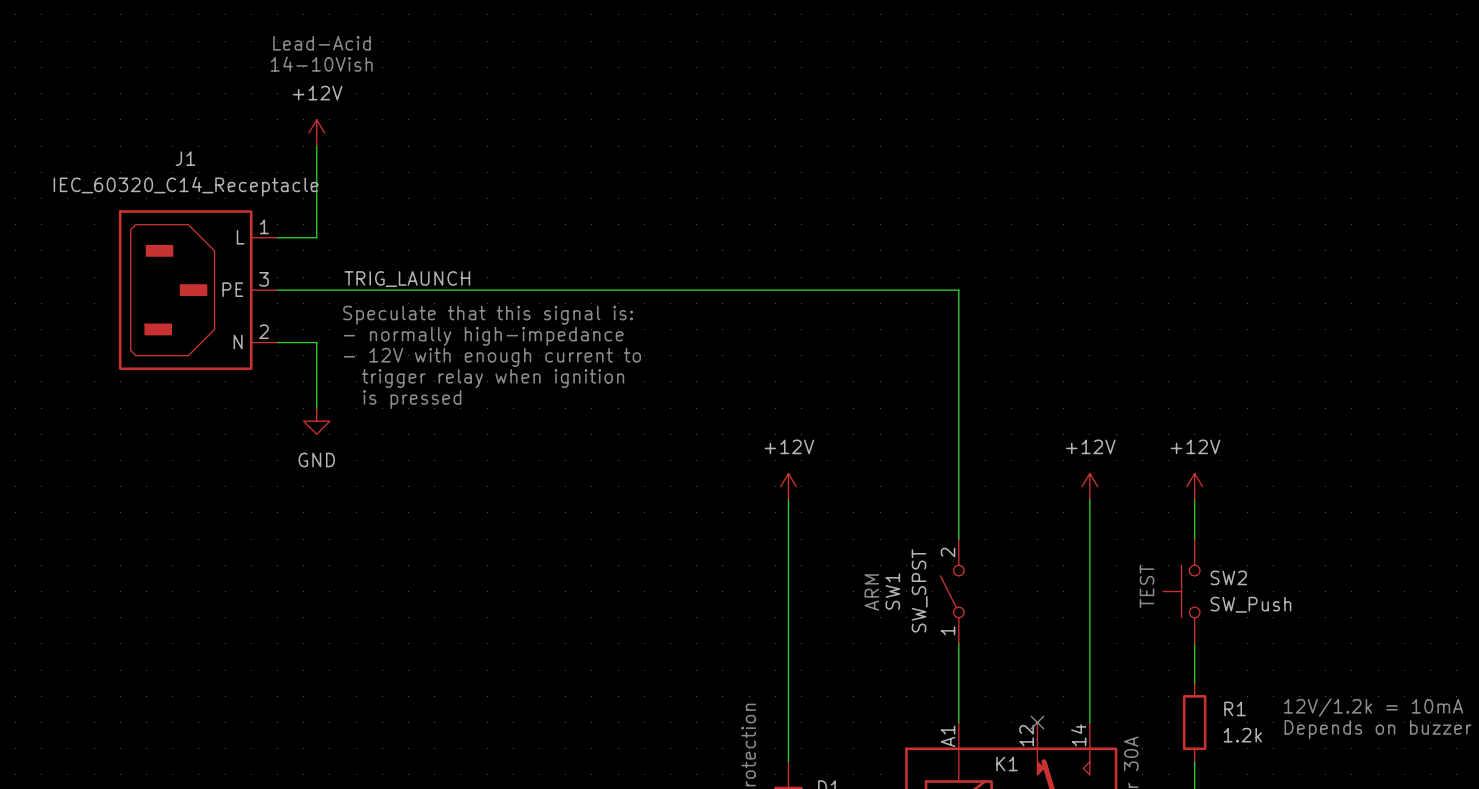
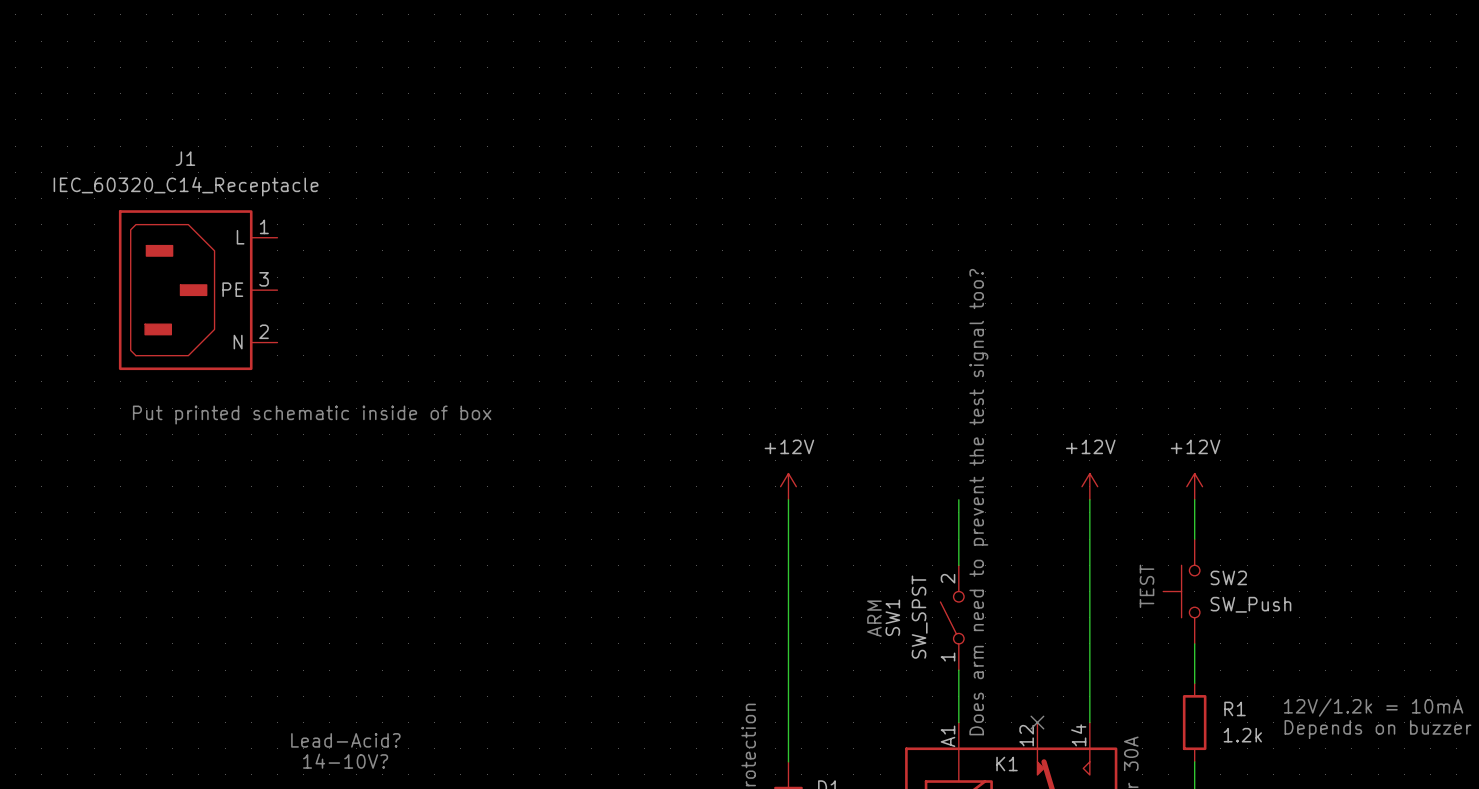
text: Lead-Acid (322, 43) -> none
text: 14-10Vish (321, 64) -> none
power symbol: +12V (316, 132) -> none
wire: (316, 146) (316, 237) (277, 237) -> none
label: TRIG_LAUNCH (407, 279) -> none
wire: (277, 290) (958, 290) (958, 499) -> none
text: Speculate that this signal is: (488, 315) -> none
text: - normally high-impedance (483, 336) -> none
wire: (277, 342) (316, 342) (316, 408) -> none
text: - 12V with enough current to (492, 357) -> none
text: trigger relay when ignition (493, 378) -> none
text: is pressed (412, 399) -> none
text: none -> Put printed schematic inside of box (312, 415)
power symbol: GND (316, 421) -> none
text: none -> Does arm need to prevent the test signal too? (978, 502)
SW1 position: (952, 591) -> (952, 617)
text position: ARM (871, 592) -> ARM (874, 618)
text: none -> Lead-Acid? (345, 740)
text: none -> 14-10V? (345, 761)

